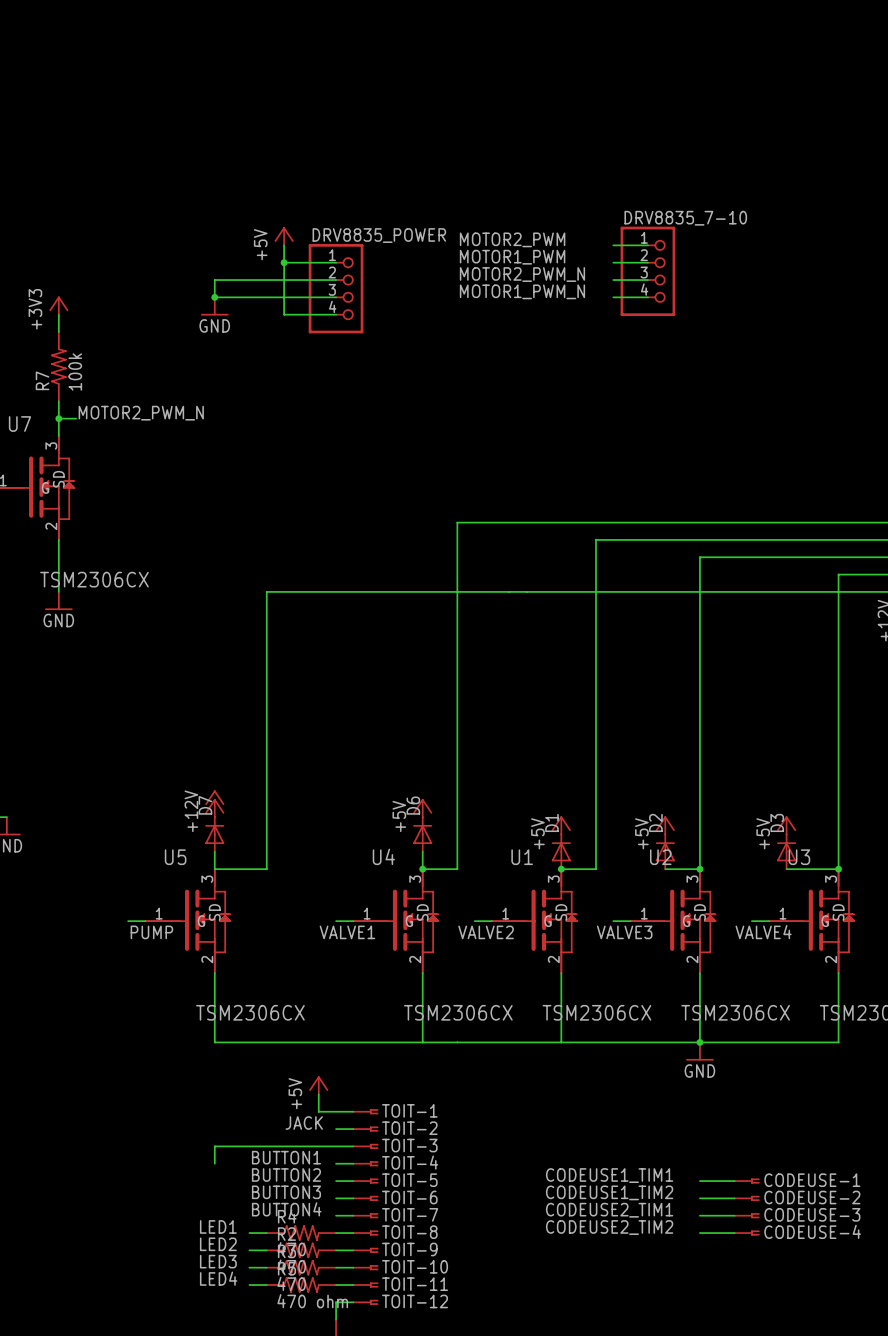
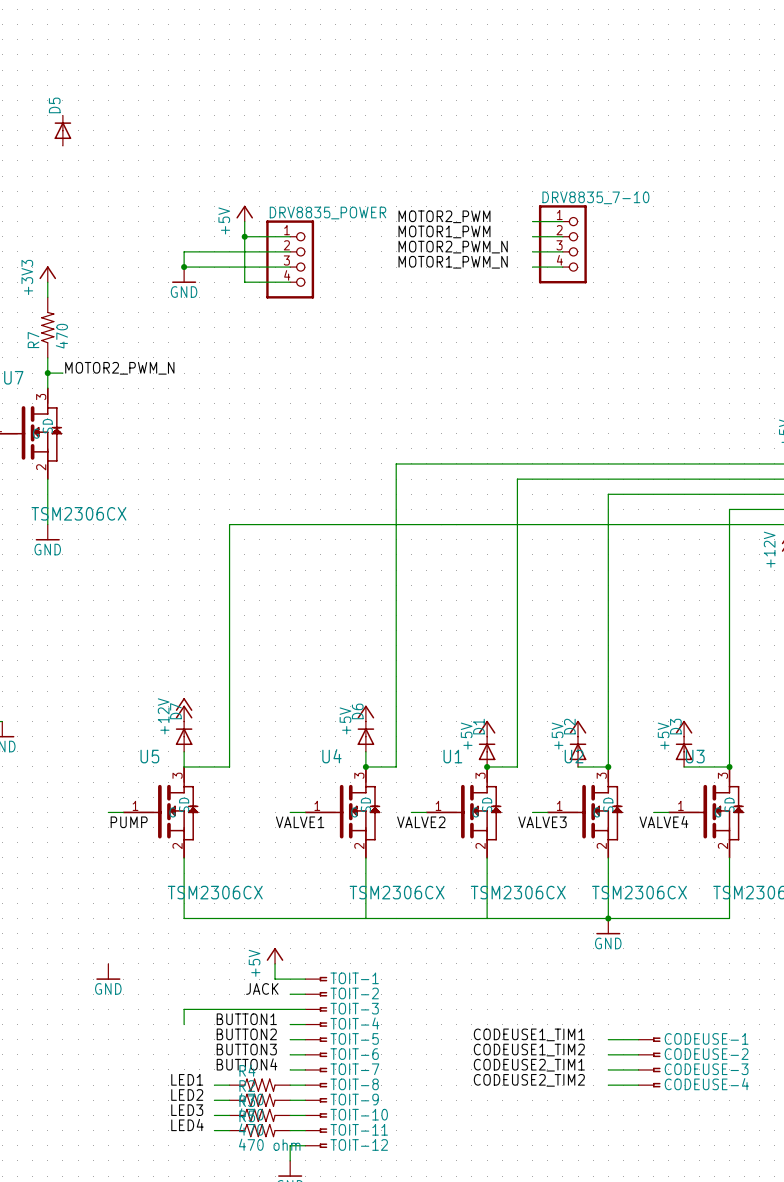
D5: none -> (62, 130)
R7 value: 100k (75, 372) -> 470 (61, 336)
power symbol: none -> GND (108, 971)

